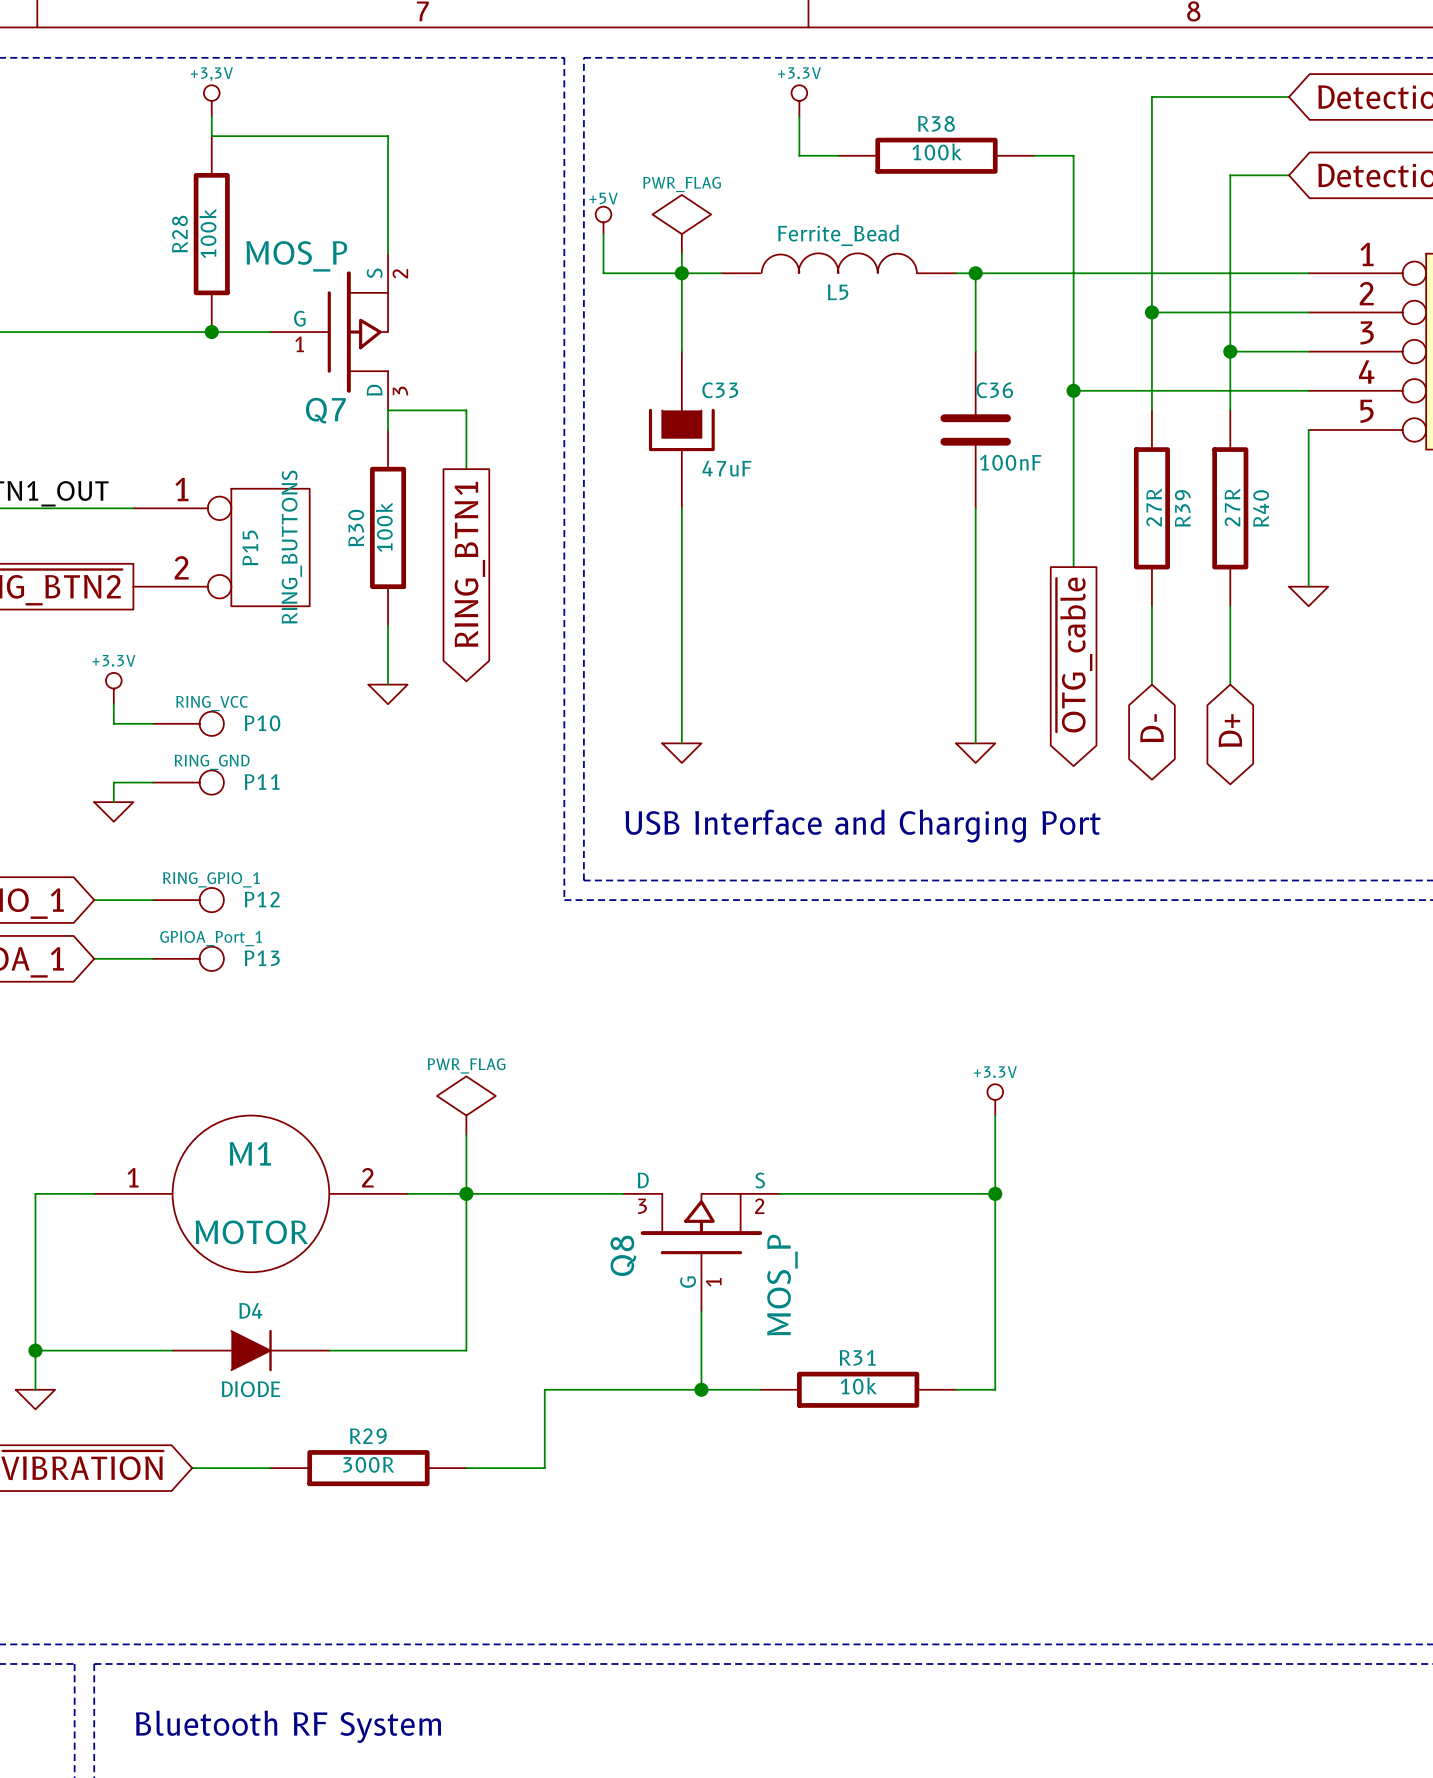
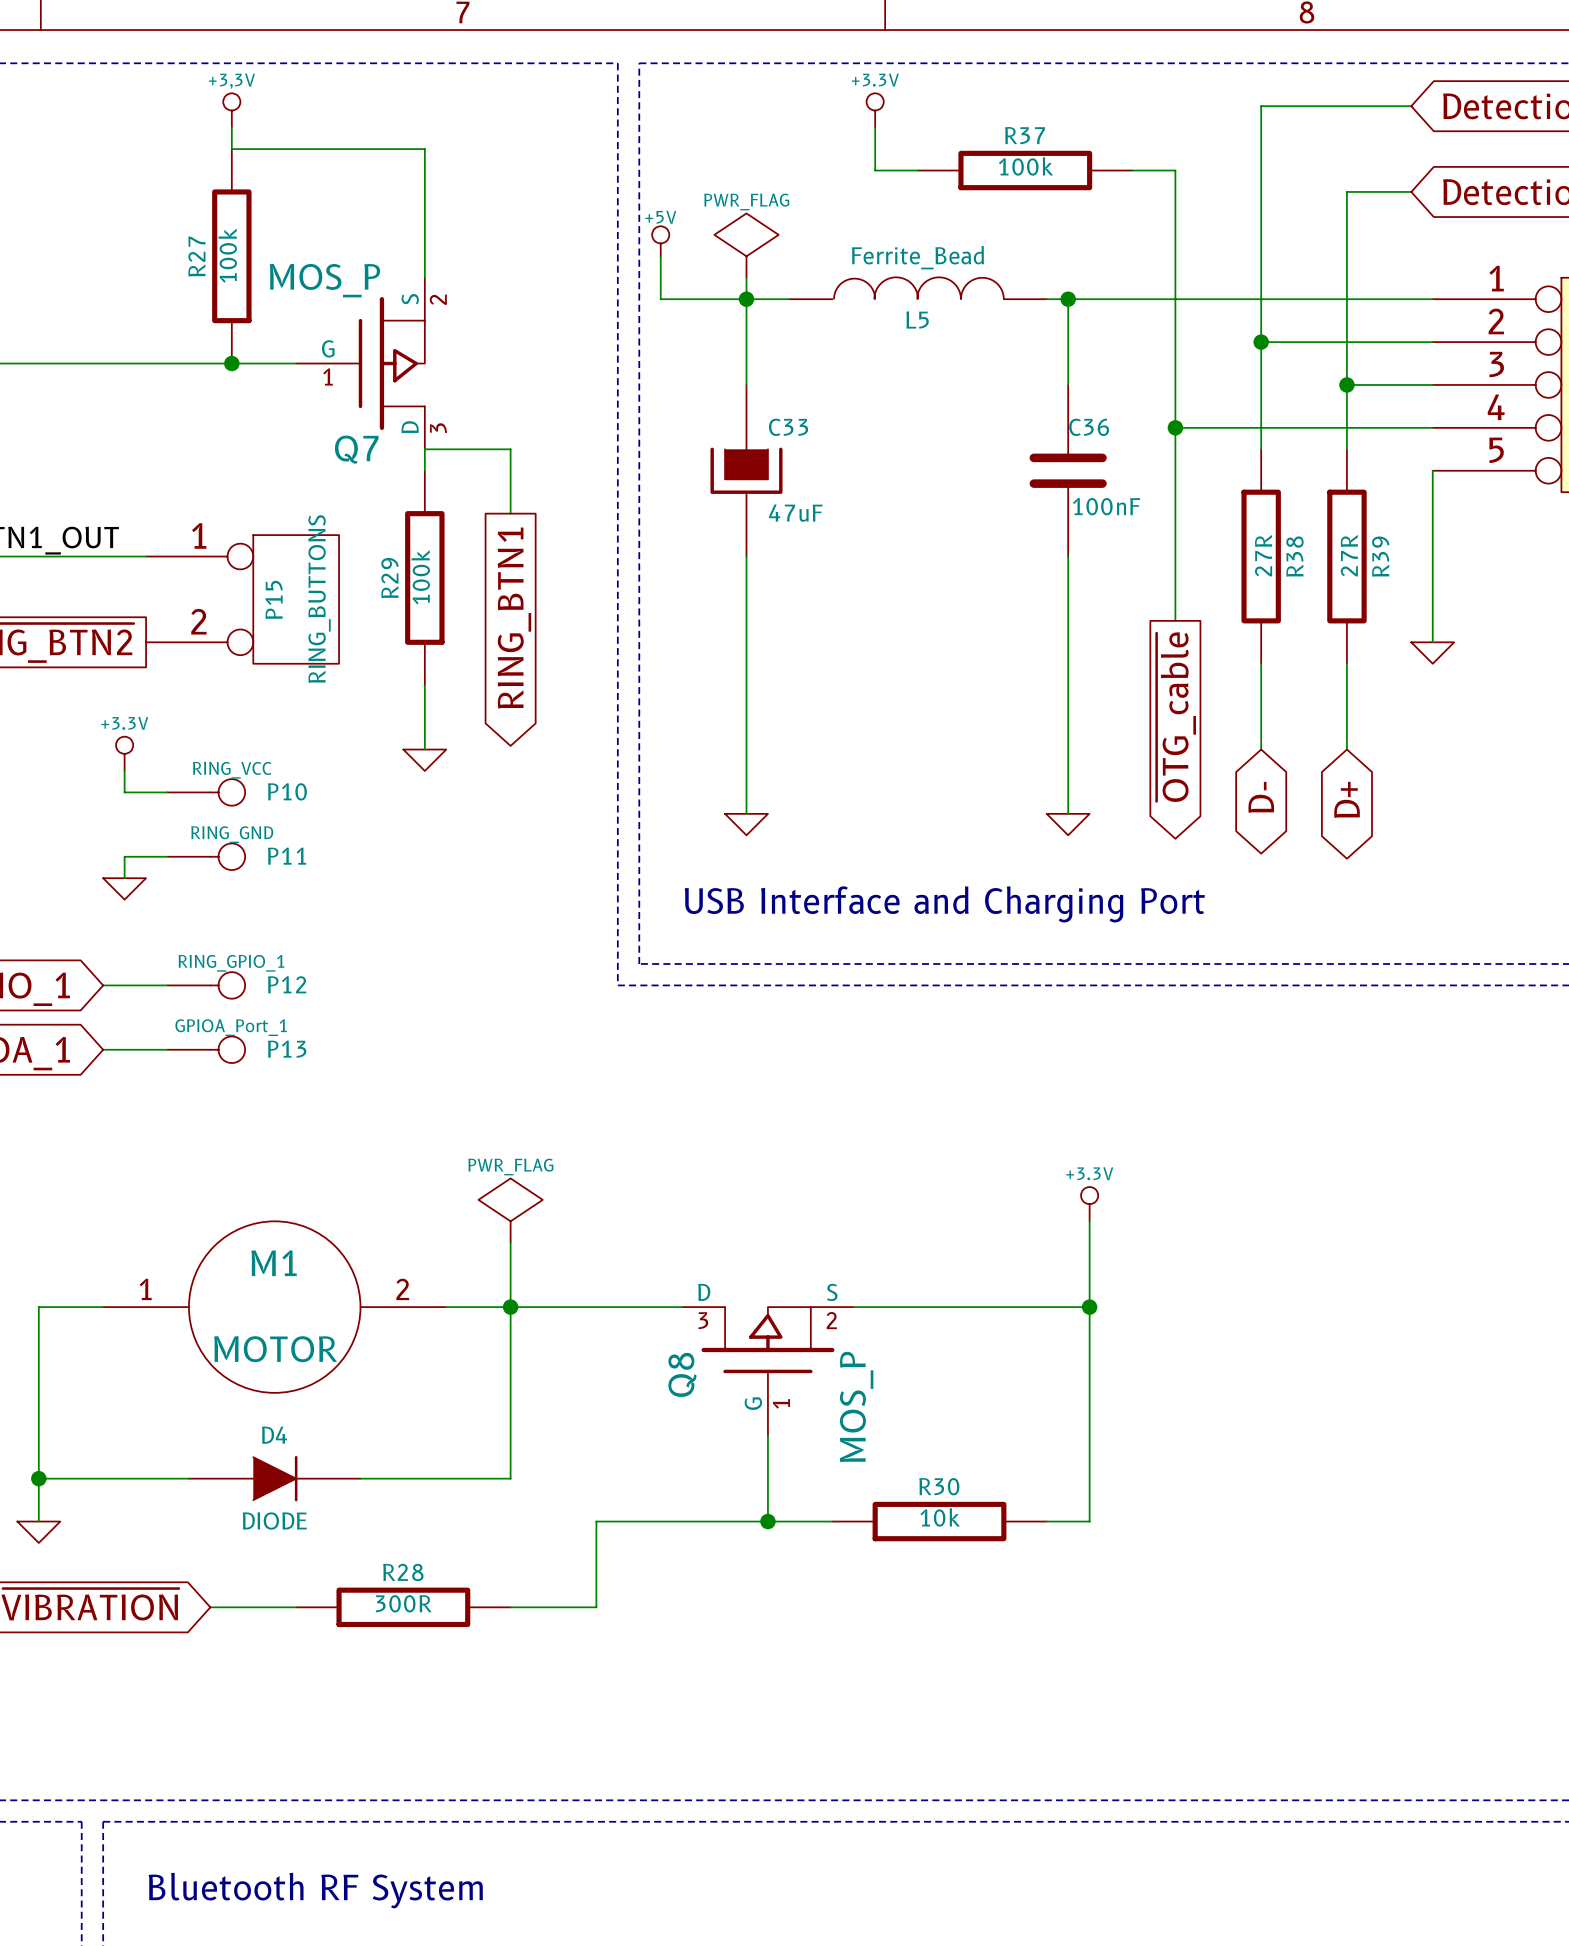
R38 name: R38 (936, 123) -> R37 (1025, 135)
R28 name: R28 (179, 234) -> R27 (196, 256)
R39 name: R39 (1182, 508) -> R38 (1294, 556)
R40 name: R40 (1261, 508) -> R39 (1380, 556)
R30 name: R30 (356, 528) -> R29 (389, 578)
R31 name: R31 (857, 1357) -> R30 (939, 1486)
R29 name: R29 (368, 1436) -> R28 (403, 1572)

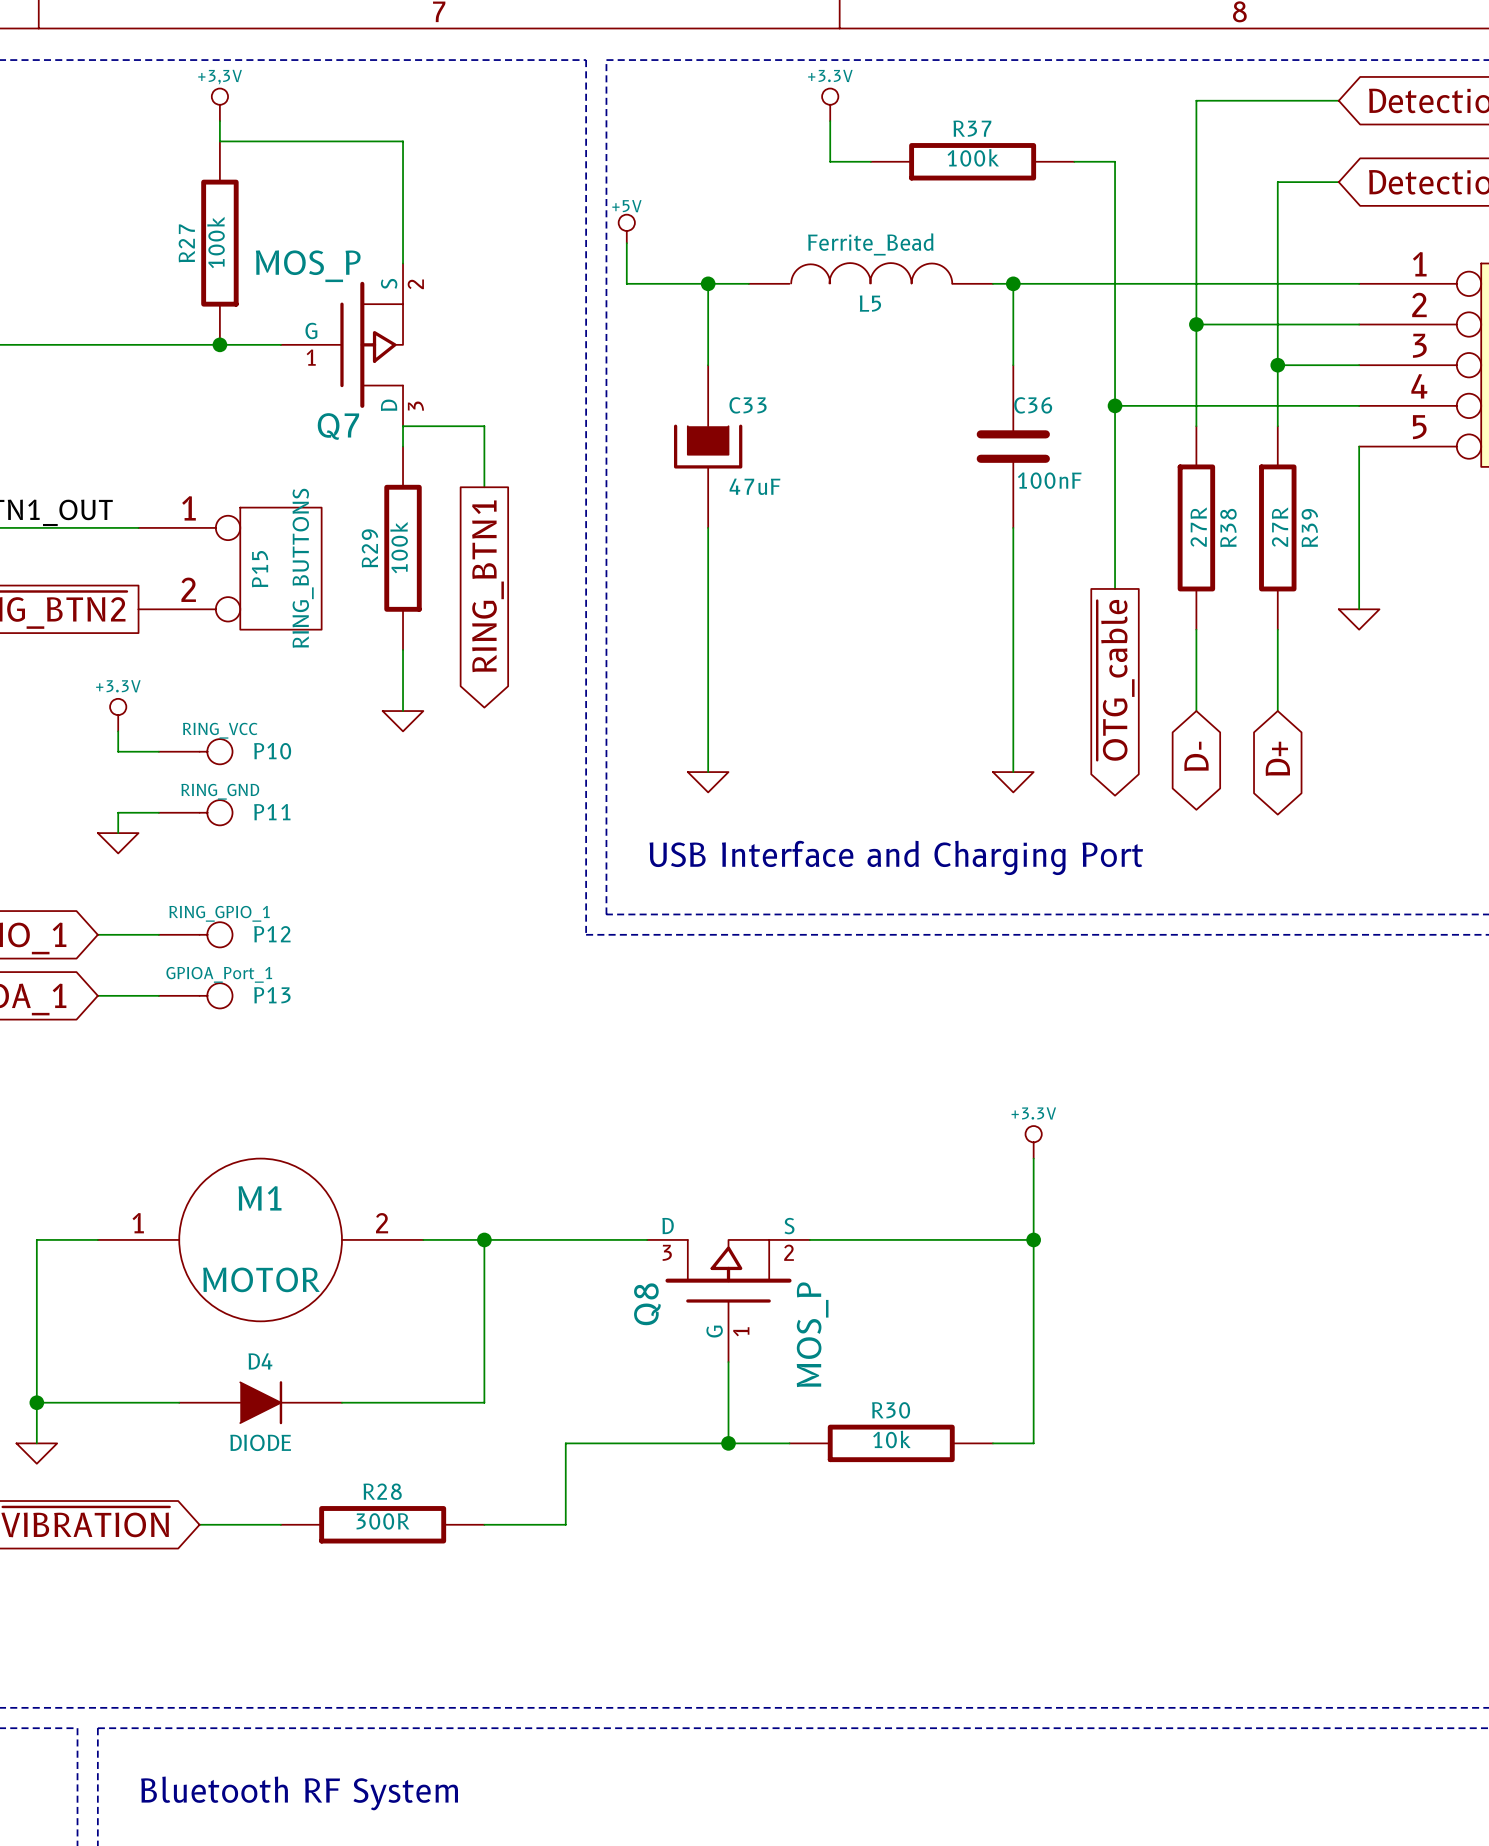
power symbol: PWR_FLAG (746, 245) -> none
wire: (746, 277) (746, 299) -> none
power symbol: PWR_FLAG (510, 1210) -> none
wire: (510, 1242) (510, 1307) -> none

